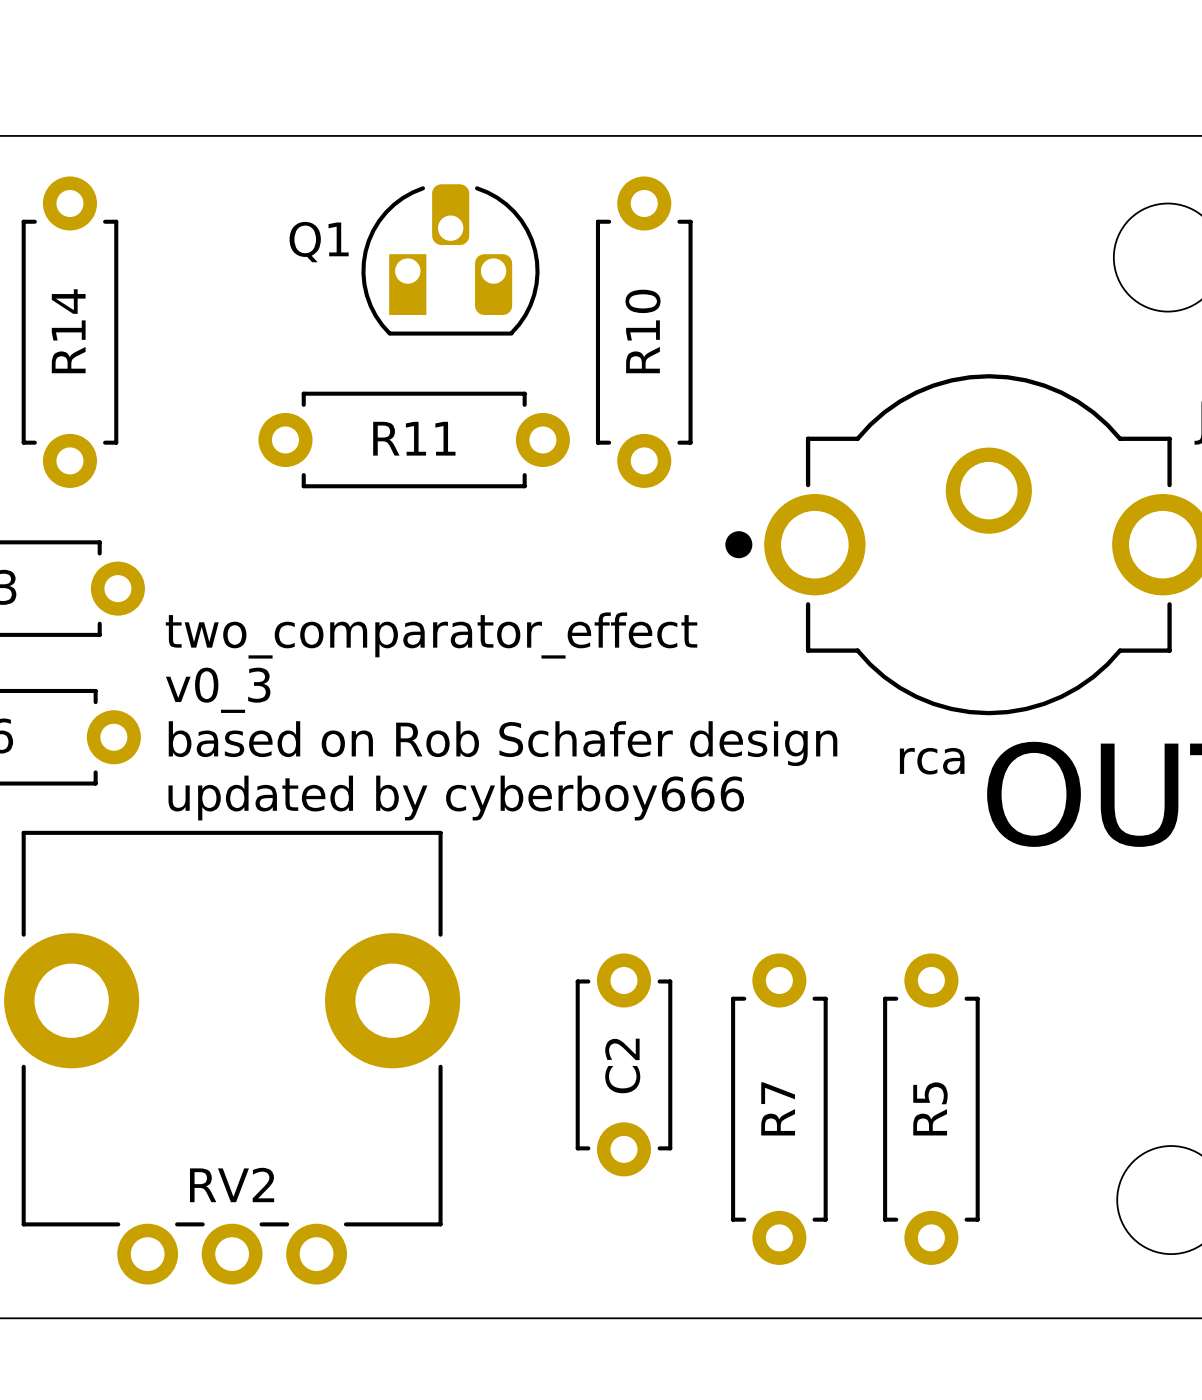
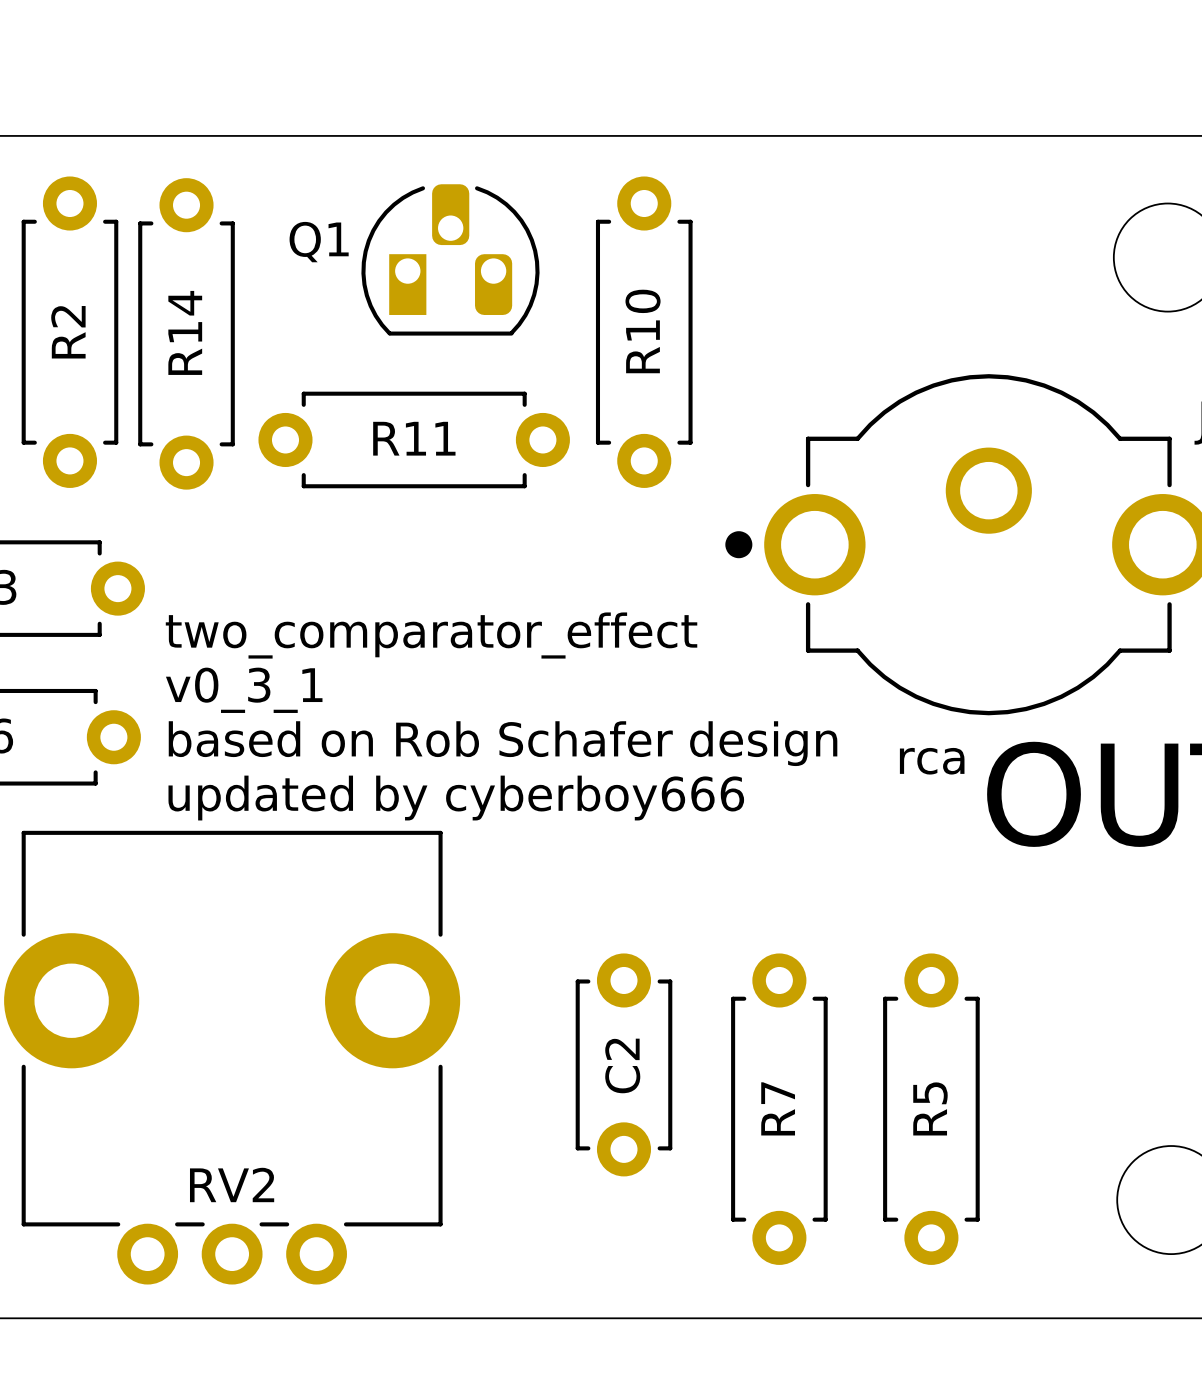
R14 name: R14 (68, 331) -> R2 (68, 332)
R14: none -> (186, 333)
text: v0_3 (218, 690) -> v0_3_1 (244, 690)

